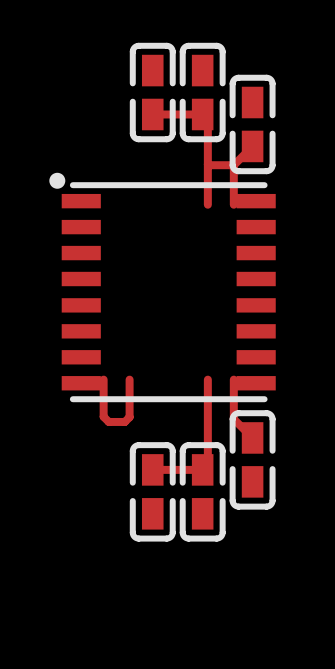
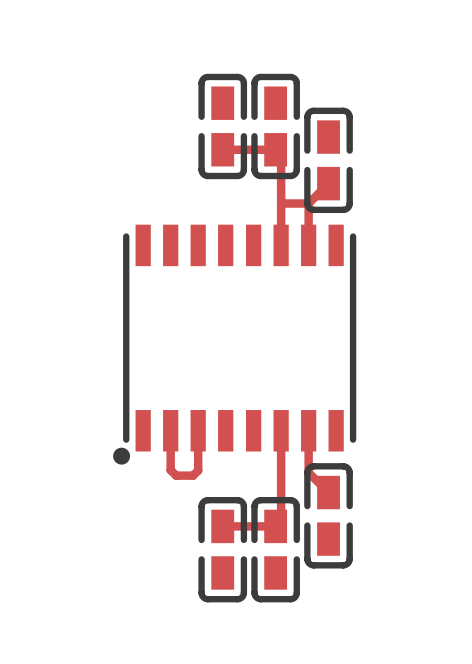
part rotation: 0° (162, 287) -> 90° counterclockwise (234, 344)

